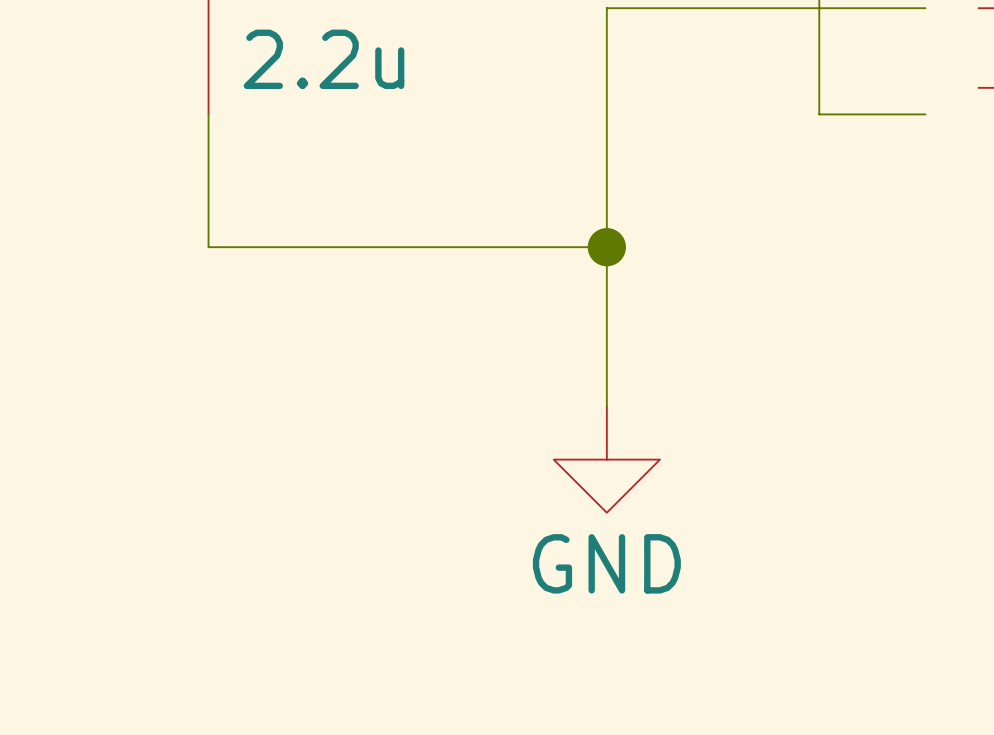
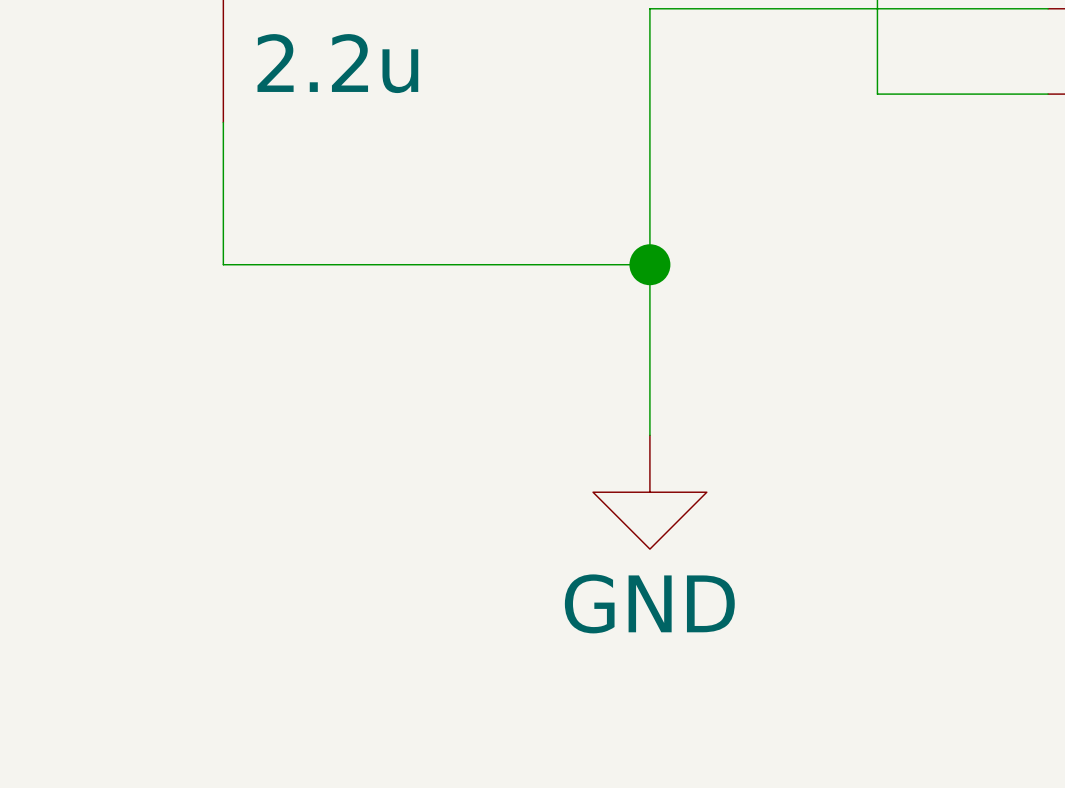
wire: none -> (991, 8) (1048, 8)
wire: (819, 87) (819, 114) (925, 114) -> (877, 94) (1048, 94)

